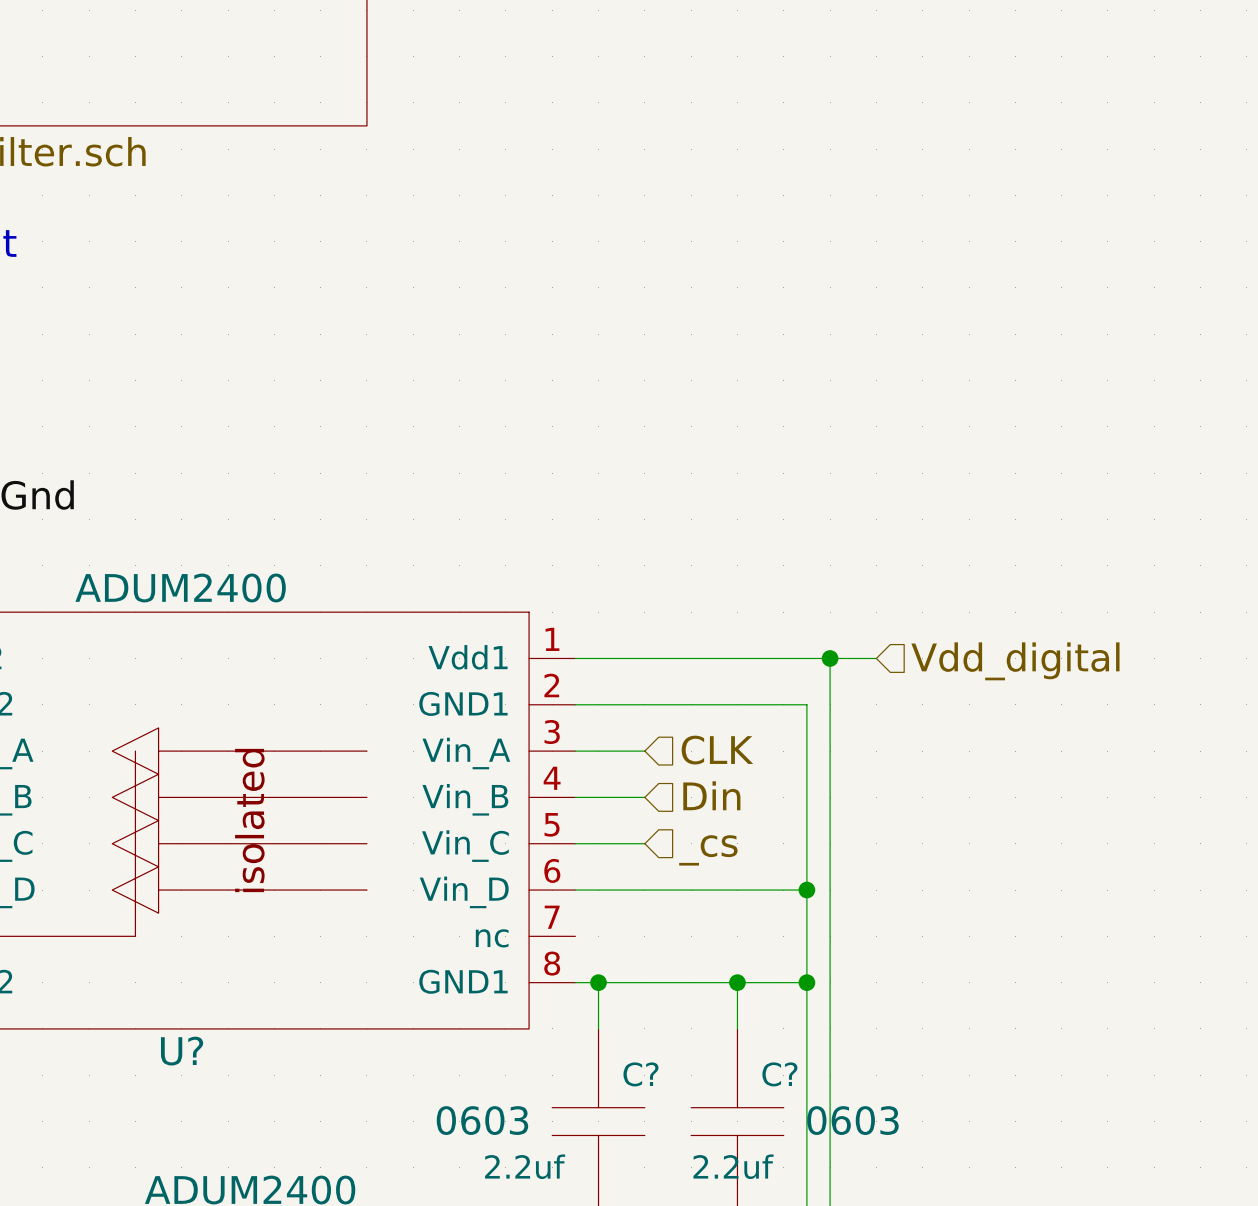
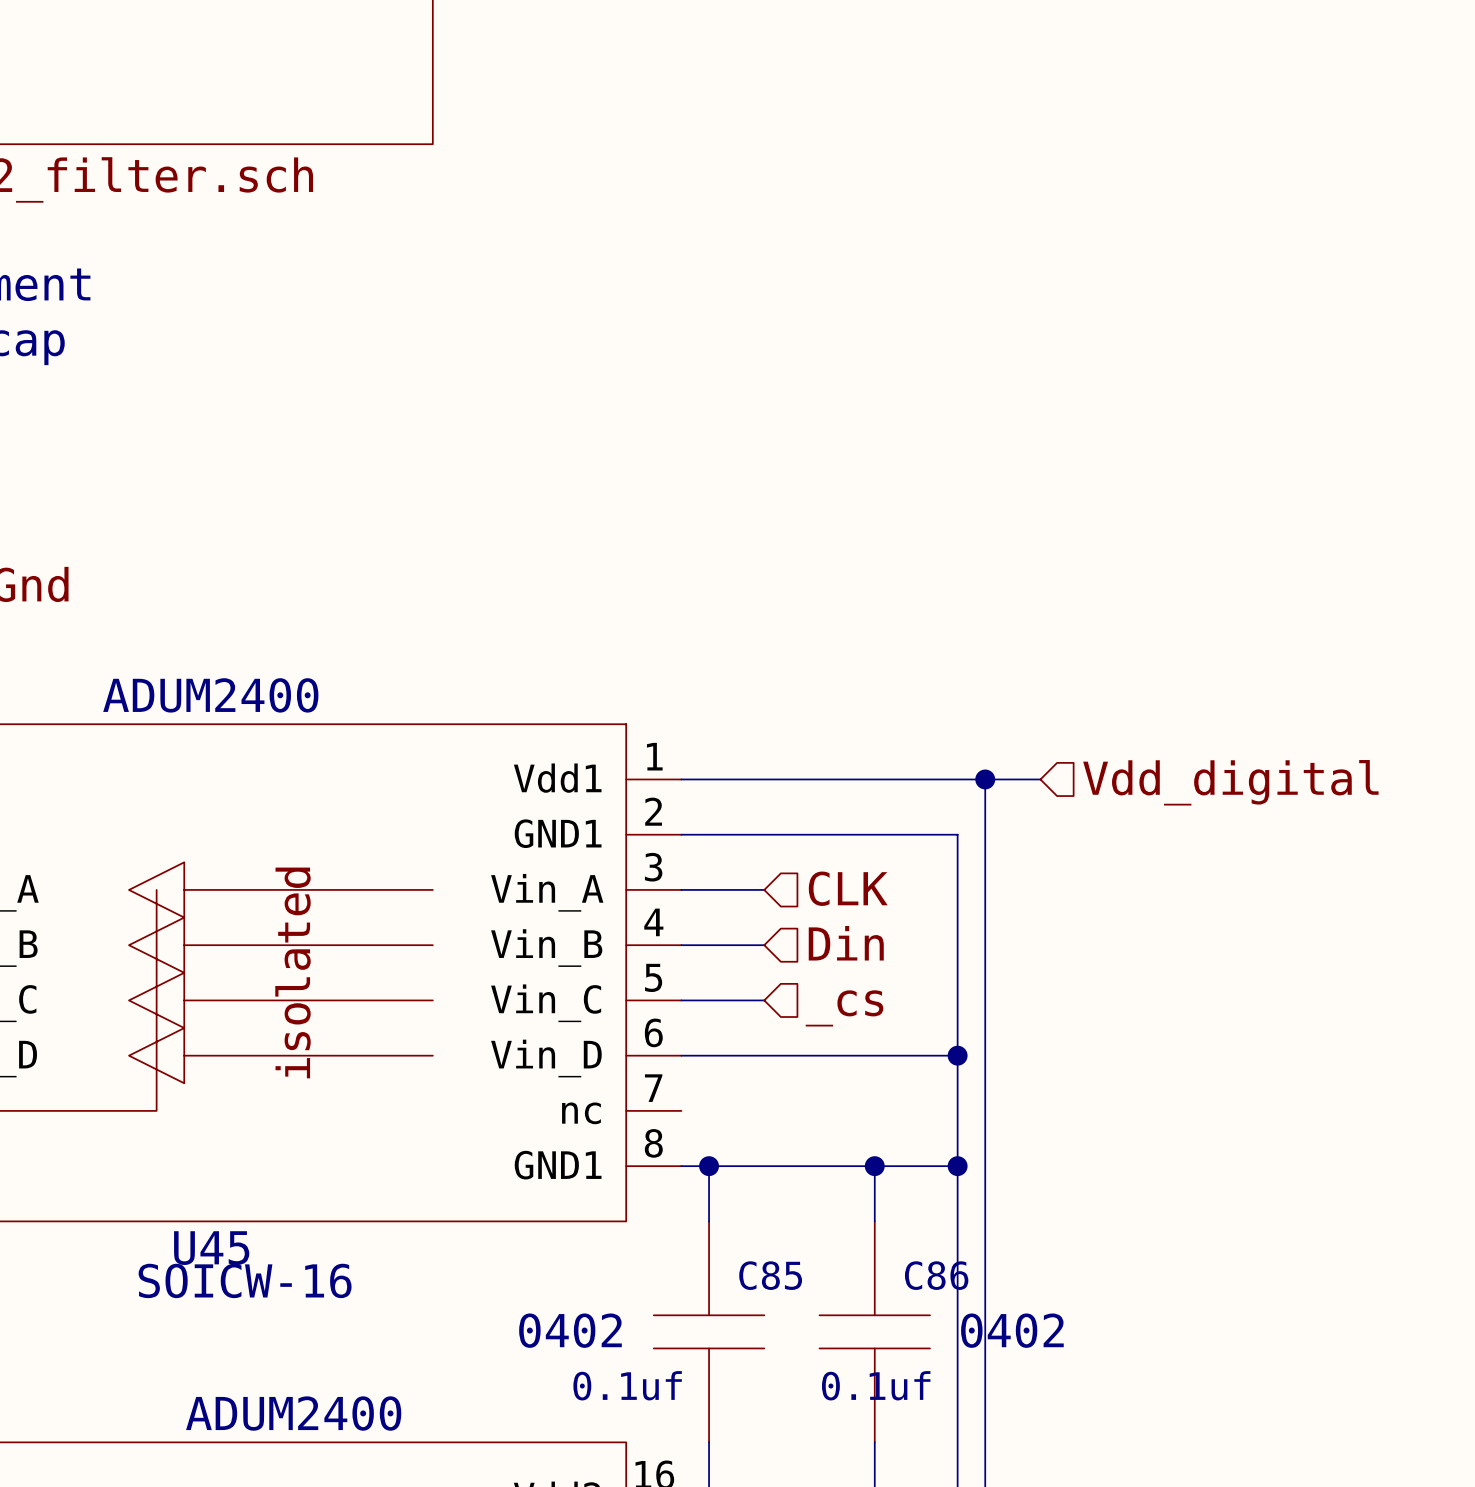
U? name: U? (182, 1051) -> U45 (211, 1248)
C? name: C? (640, 1074) -> C85 (770, 1275)
C? name: C? (779, 1074) -> C86 (936, 1275)
U? text: none -> SOICW-16 (245, 1280)
C? text: 0603 (482, 1120) -> 0402 (570, 1330)
C? text: 0603 (852, 1120) -> 0402 (1012, 1330)
C? value: 2.2uf (525, 1166) -> 0.1uf (627, 1385)
C? value: 2.2uf (733, 1166) -> 0.1uf (876, 1385)

